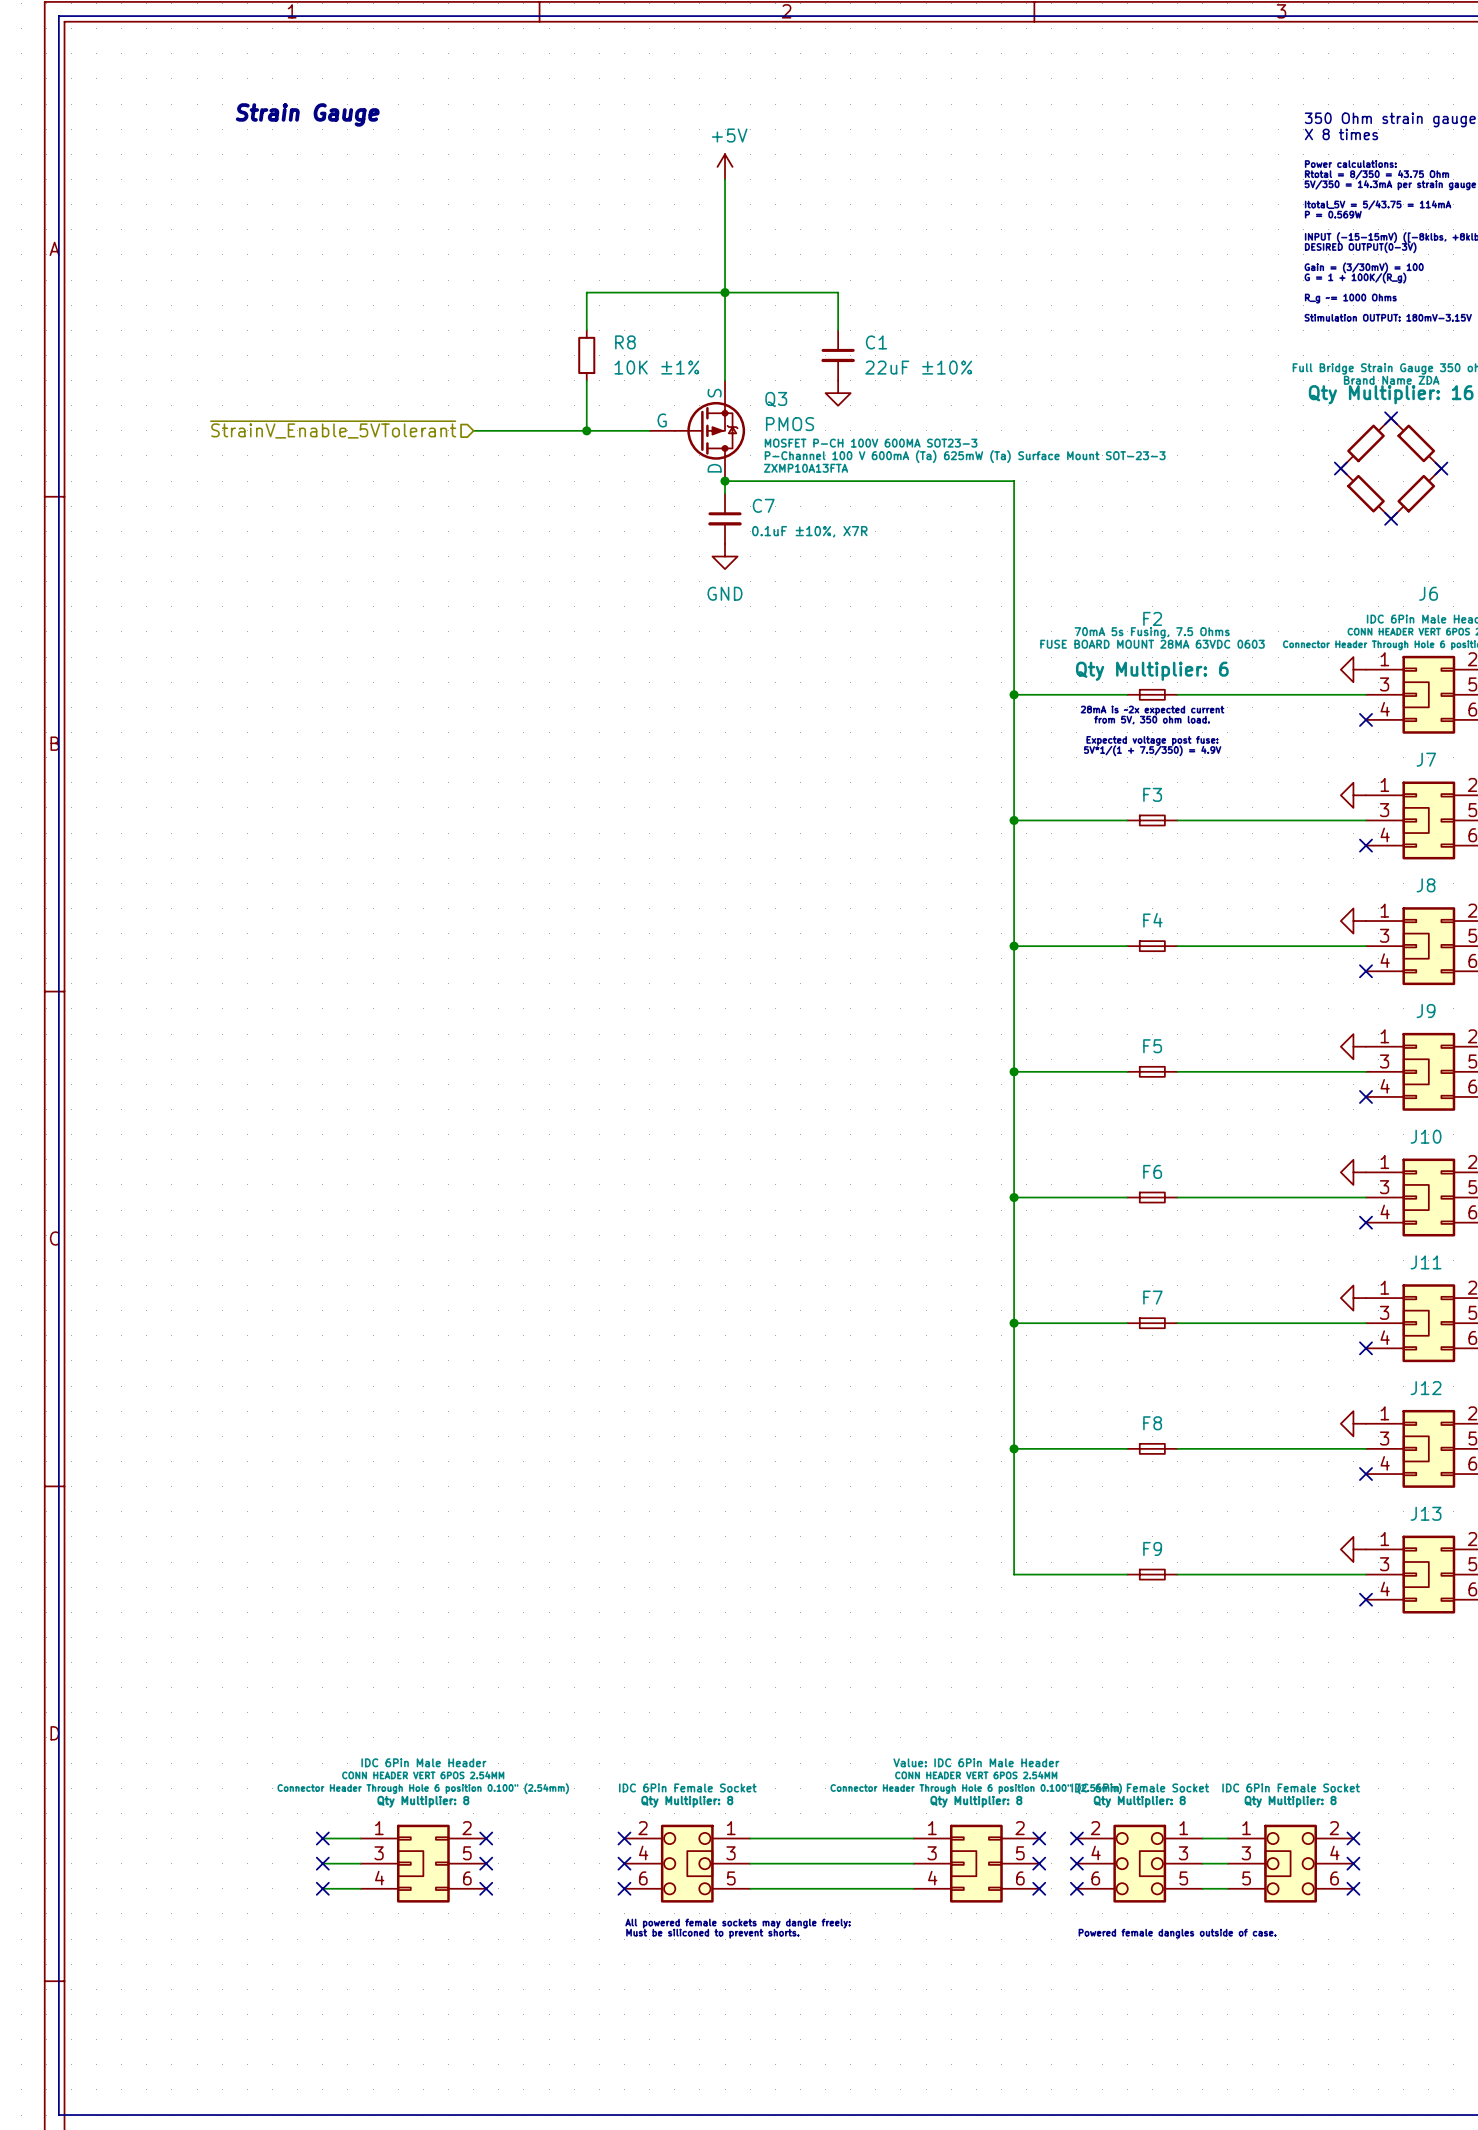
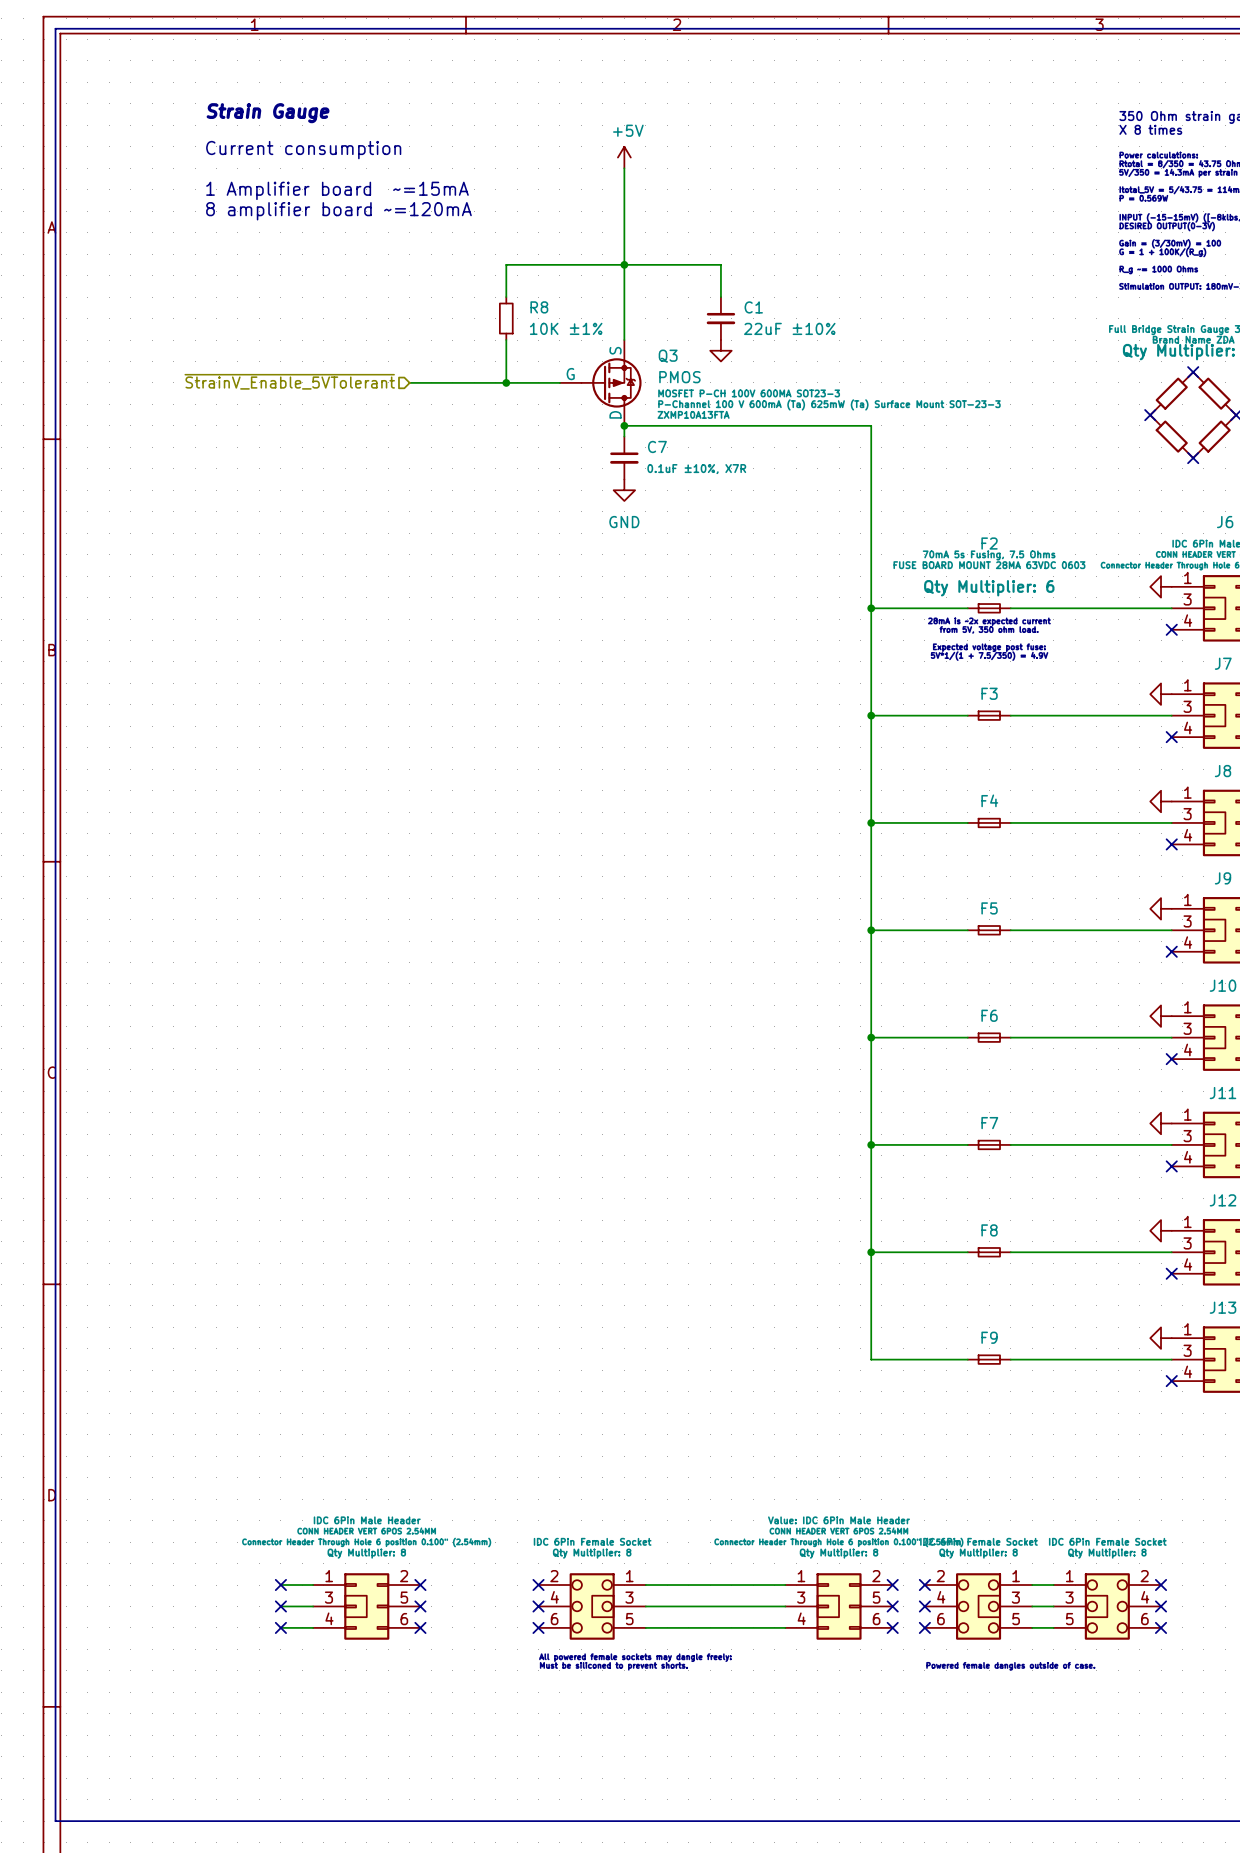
text: none -> Current consumption (303, 150)
text: none -> 1 Amplifier board ~=15mA (337, 190)
text: none -> 8 amplifier board ~=120mA (338, 211)

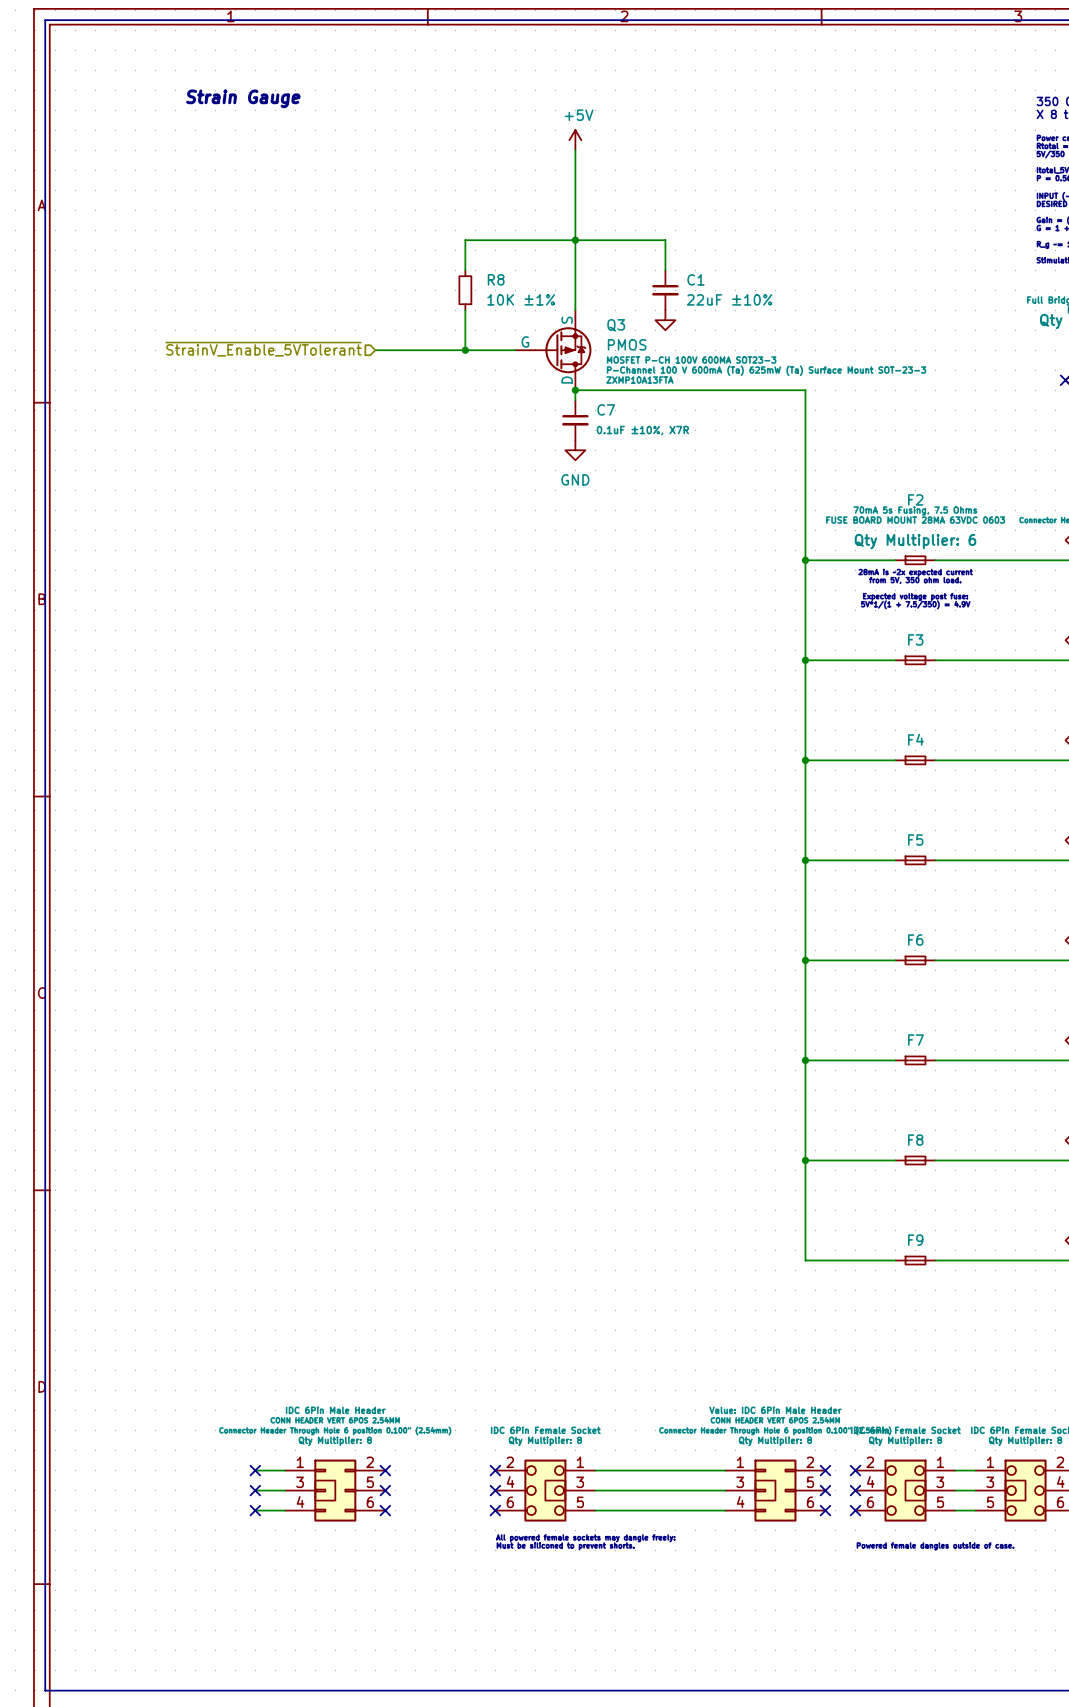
text: Current consumption (303, 150) -> none
text: 1 Amplifier board ~=15mA (337, 190) -> none
text: 8 amplifier board ~=120mA (338, 211) -> none

